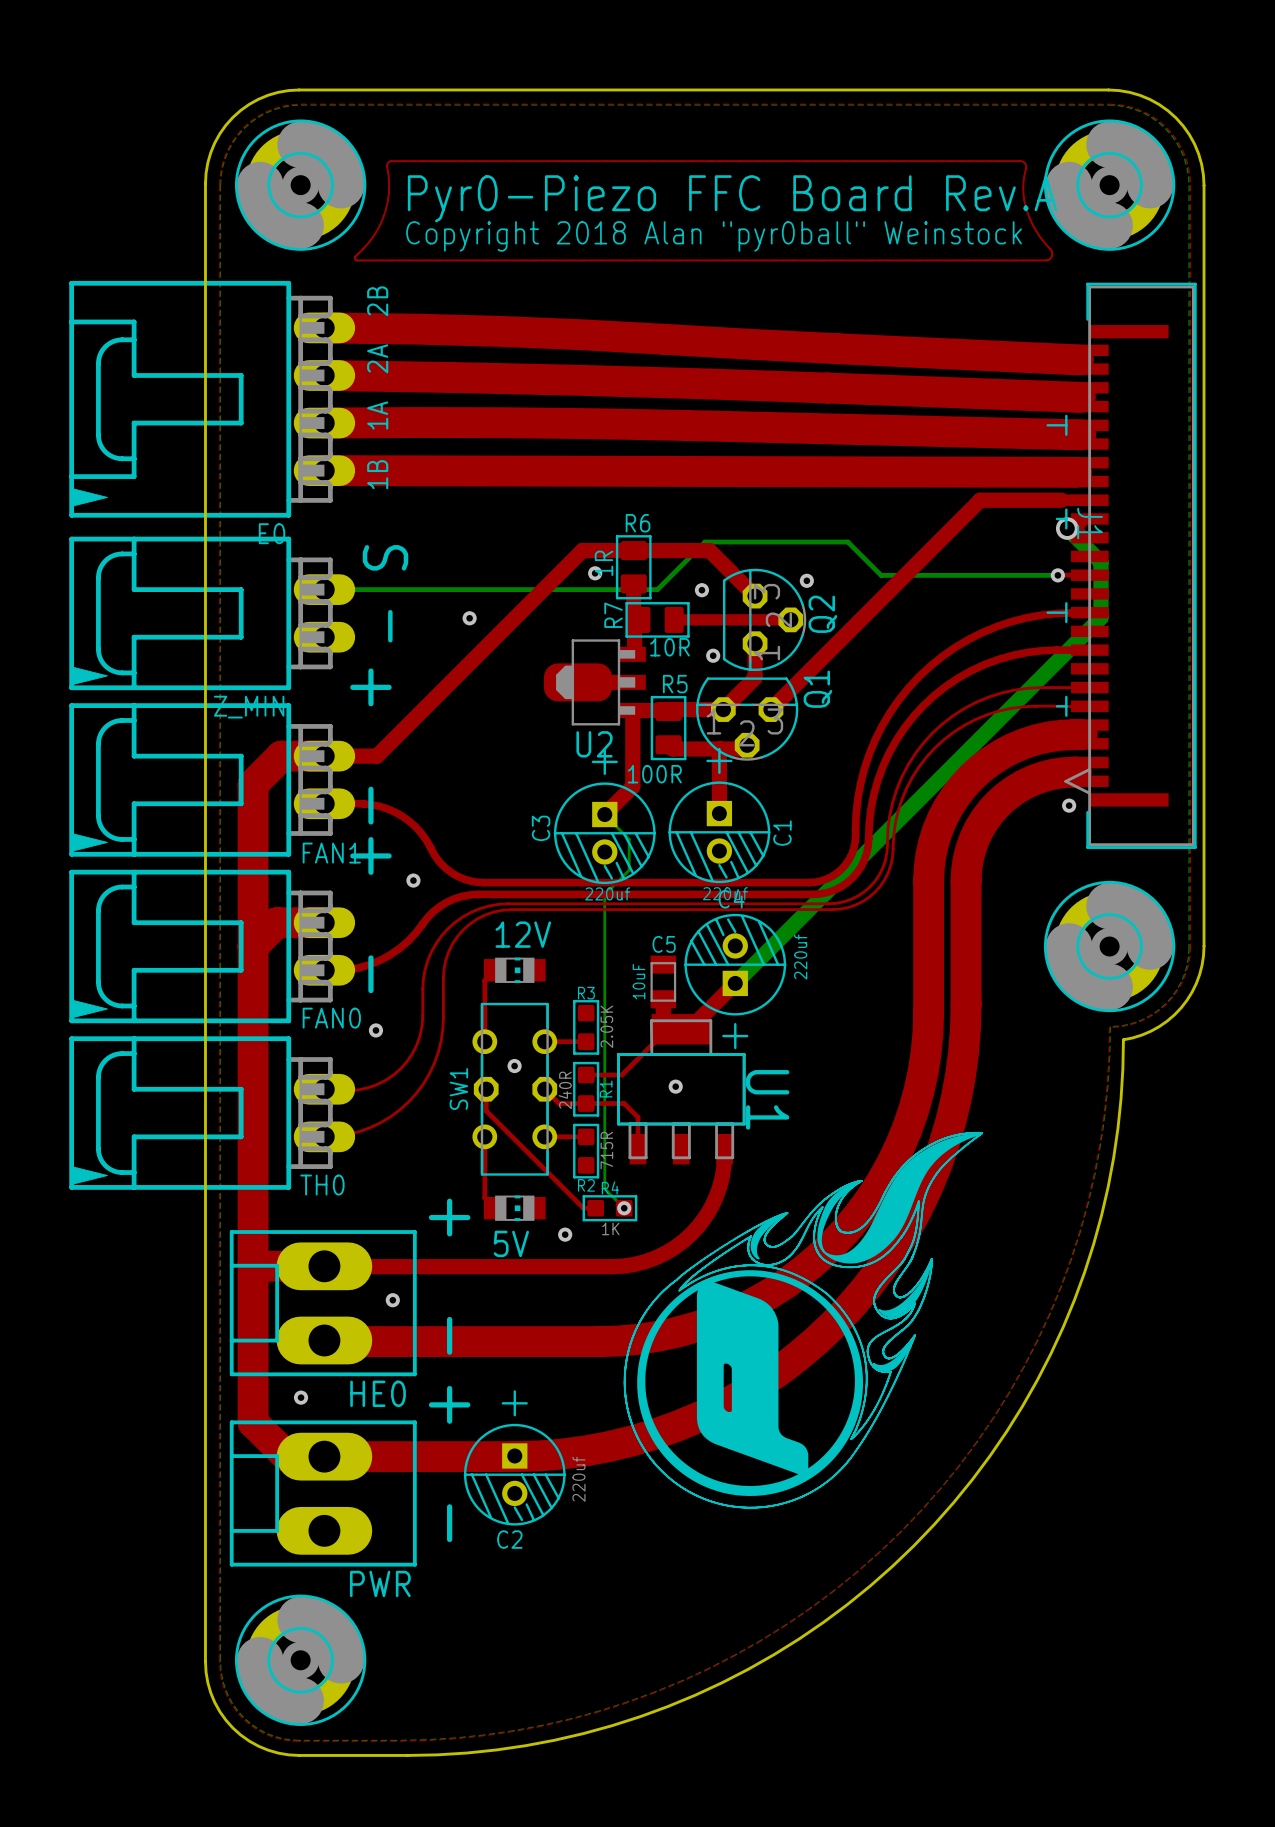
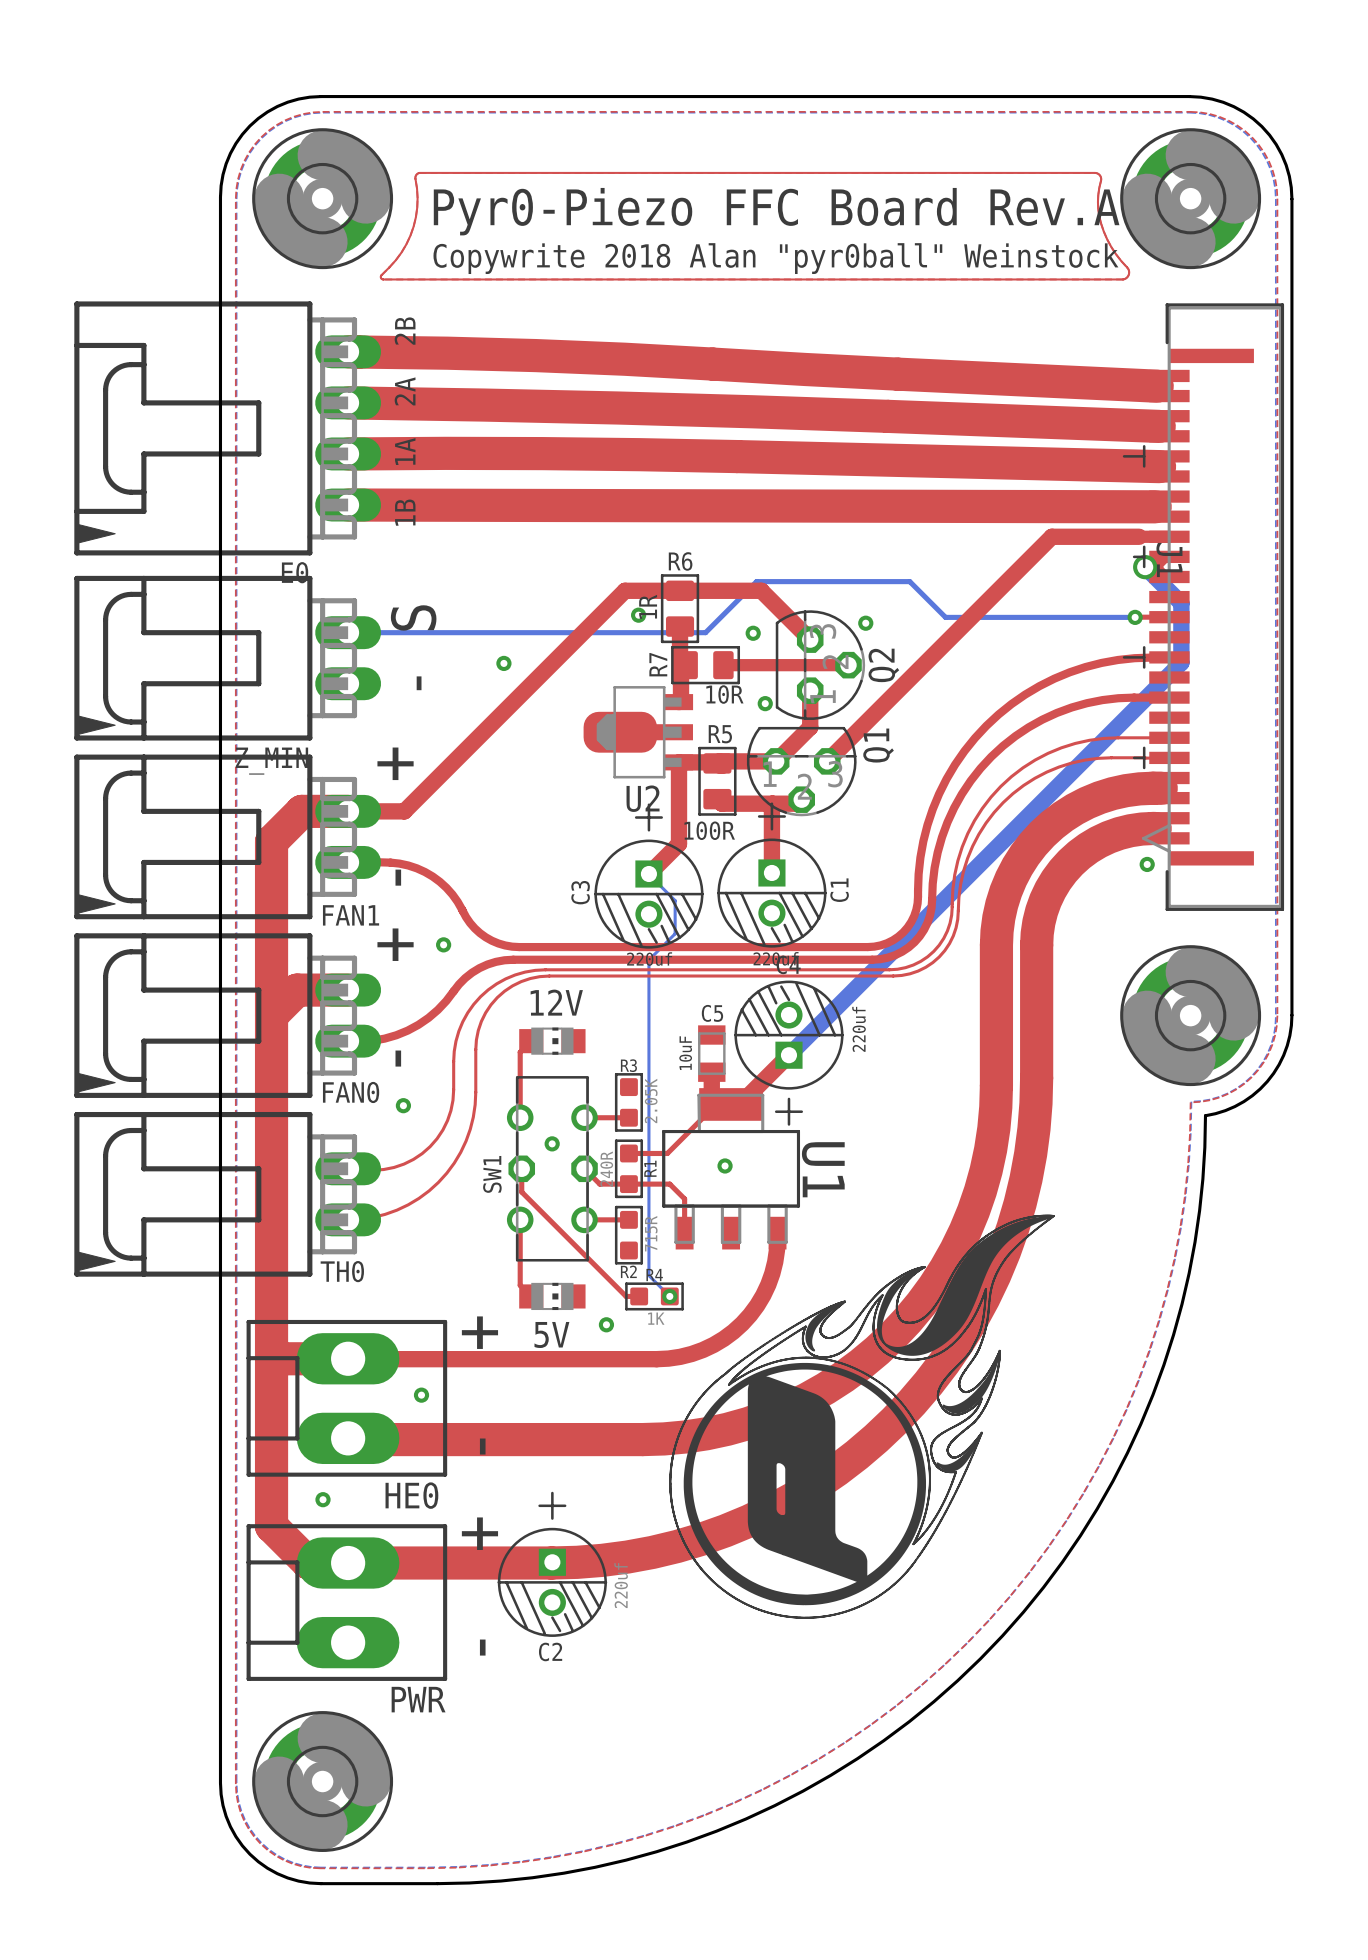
text: Copyright 2018 Alan "pyr0ball" Weinstock (714, 236) -> Copywrite 2018 Alan "pyr0ball" Weinstock (775, 258)

